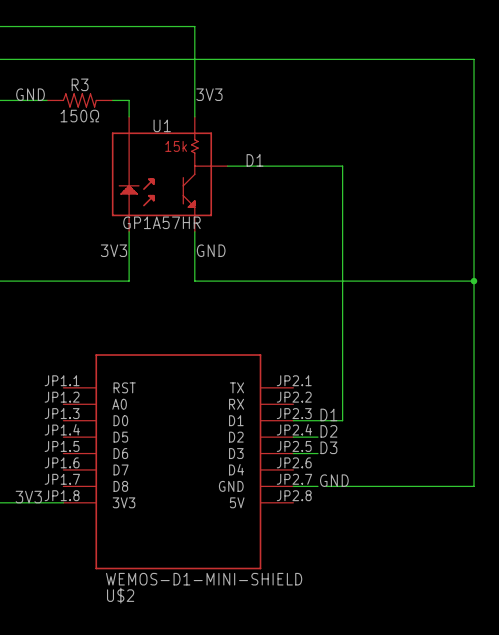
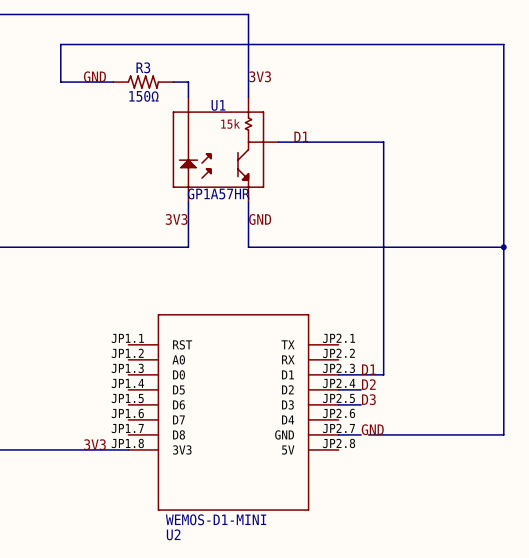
U$2 value: WEMOS-D1-MINI-SHIELD (204, 579) -> WEMOS-D1-MINI (216, 519)
U$2 name: U$2 (120, 595) -> U2 (173, 534)

